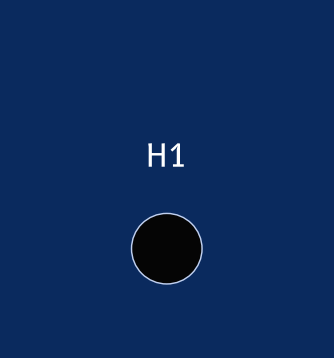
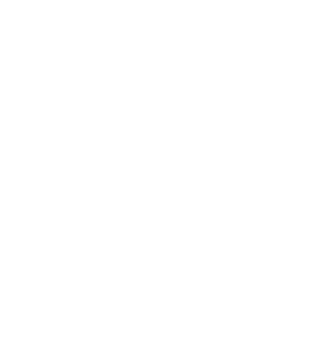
H1: (166, 248) -> none

